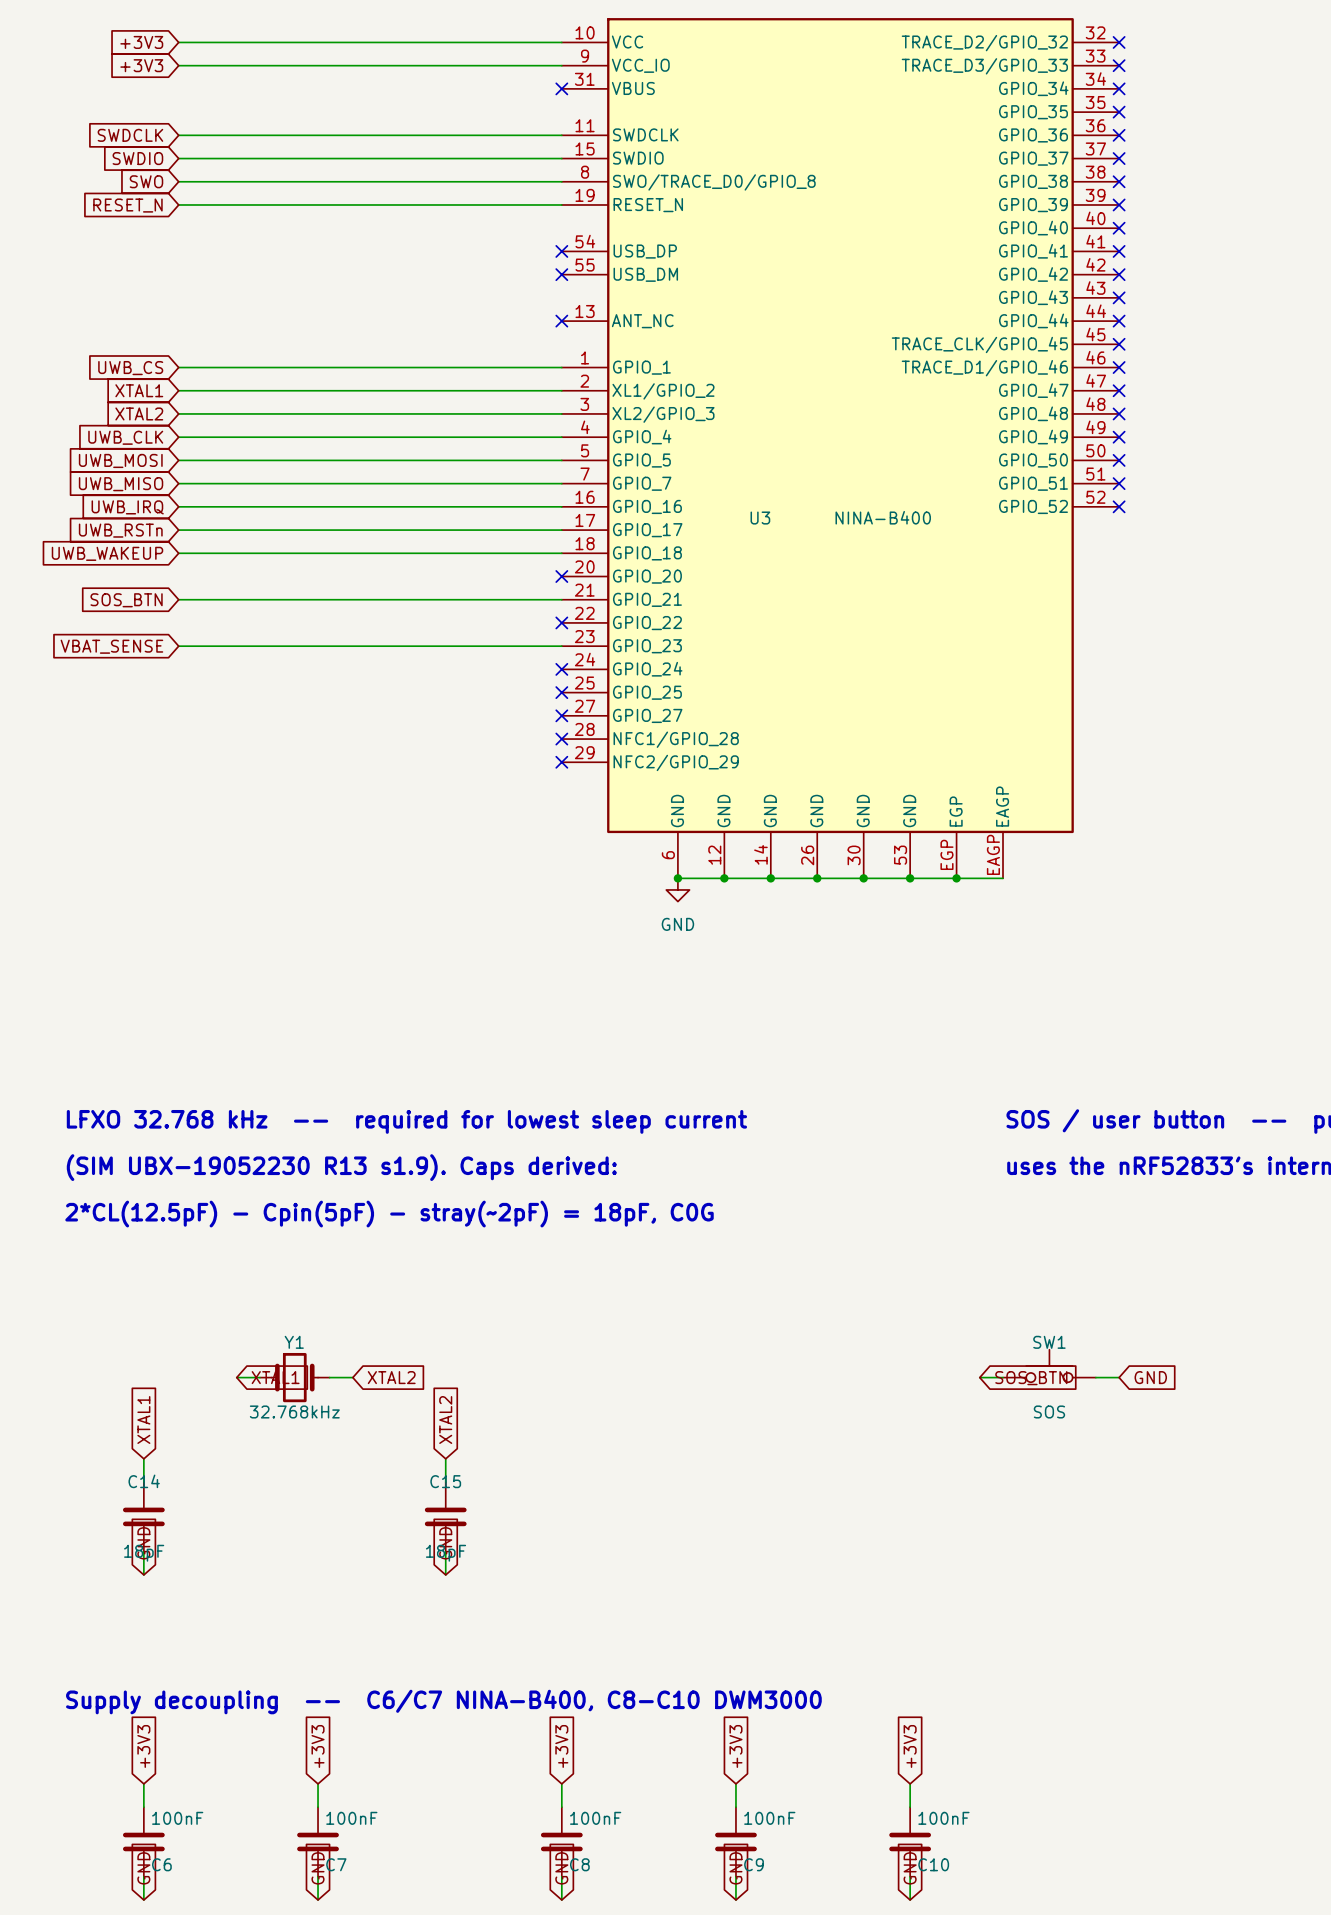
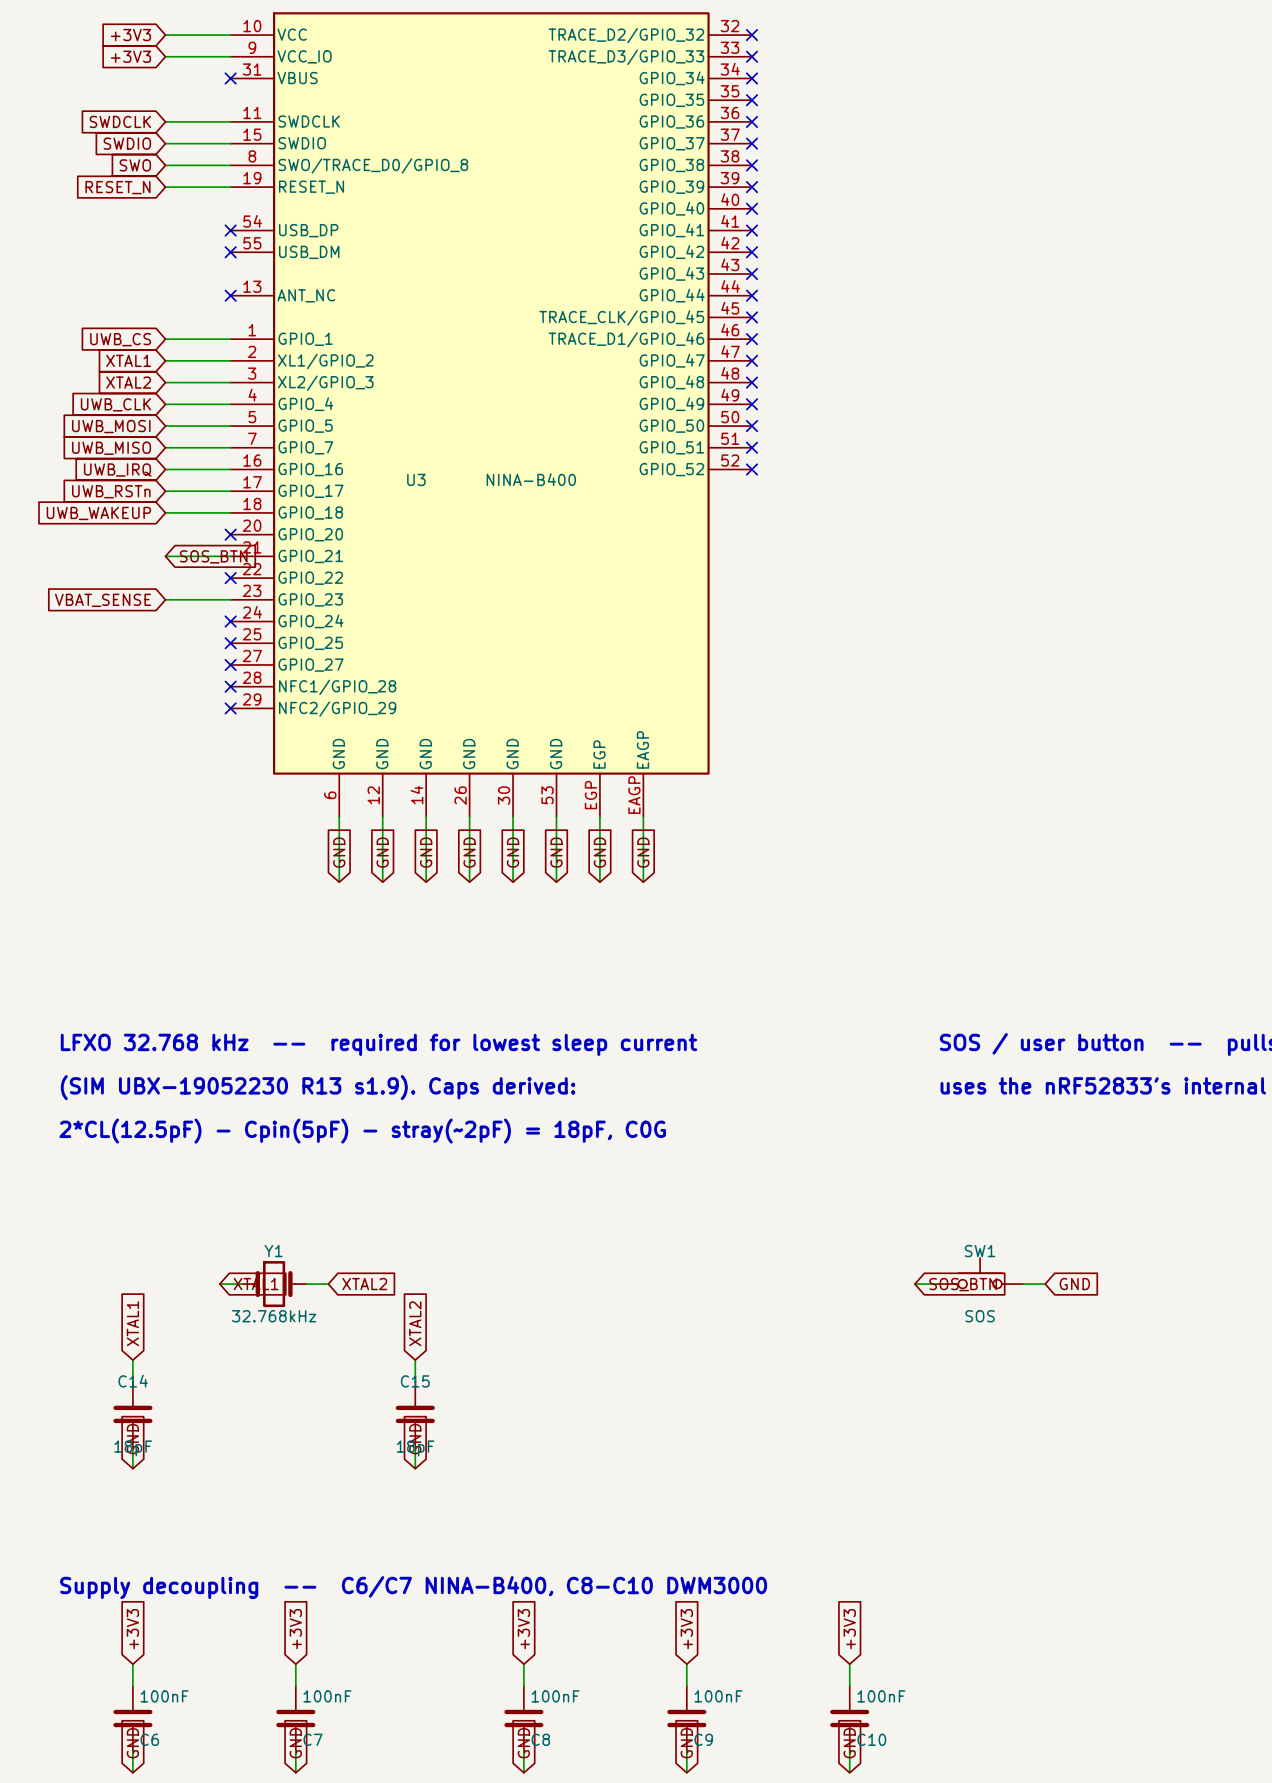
no-connect mark: none -> (751, 35)
no-connect mark: (1119, 42) -> none
no-connect mark: none -> (751, 56)
no-connect mark: (1119, 65) -> none
no-connect mark: none -> (230, 78)
no-connect mark: (561, 88) -> none
no-connect mark: none -> (751, 78)
no-connect mark: (1119, 88) -> none
no-connect mark: none -> (751, 100)
no-connect mark: (1119, 112) -> none
no-connect mark: none -> (751, 121)
no-connect mark: (1119, 135) -> none
no-connect mark: none -> (751, 143)
no-connect mark: (1119, 158) -> none
no-connect mark: none -> (751, 165)
no-connect mark: (1119, 181) -> none
no-connect mark: none -> (751, 187)
no-connect mark: (1119, 204) -> none
no-connect mark: none -> (751, 208)
no-connect mark: (1119, 228) -> none
no-connect mark: none -> (230, 230)
no-connect mark: (561, 251) -> none
no-connect mark: none -> (751, 230)
no-connect mark: (1119, 251) -> none
no-connect mark: none -> (230, 252)
no-connect mark: (561, 274) -> none
no-connect mark: none -> (751, 252)
no-connect mark: (1119, 274) -> none
no-connect mark: none -> (751, 273)
no-connect mark: (1119, 297) -> none
no-connect mark: none -> (230, 295)
no-connect mark: (561, 321) -> none
no-connect mark: none -> (751, 295)
no-connect mark: (1119, 321) -> none
no-connect mark: none -> (751, 317)
no-connect mark: (1119, 344) -> none
no-connect mark: none -> (751, 339)
no-connect mark: (1119, 367) -> none
no-connect mark: none -> (751, 360)
no-connect mark: (1119, 390) -> none
no-connect mark: none -> (751, 382)
no-connect mark: (1119, 413) -> none
no-connect mark: none -> (751, 404)
no-connect mark: (1119, 437) -> none
U3 position: (840, 448) -> (491, 414)
no-connect mark: none -> (751, 426)
no-connect mark: (1119, 460) -> none
no-connect mark: none -> (751, 447)
no-connect mark: (1119, 483) -> none
no-connect mark: none -> (751, 469)
no-connect mark: (1119, 506) -> none
no-connect mark: none -> (230, 534)
no-connect mark: (561, 576) -> none
global label rotation: 0° (126, 600) -> 180° (213, 556)
no-connect mark: none -> (230, 578)
no-connect mark: (561, 622) -> none
no-connect mark: none -> (230, 621)
no-connect mark: (561, 669) -> none
no-connect mark: none -> (230, 643)
no-connect mark: (561, 692) -> none
no-connect mark: none -> (230, 664)
no-connect mark: (561, 715) -> none
no-connect mark: none -> (230, 686)
no-connect mark: (561, 739) -> none
no-connect mark: none -> (230, 708)
no-connect mark: (561, 762) -> none
wire: none -> (339, 817) (339, 882)
wire: none -> (382, 817) (382, 882)
wire: none -> (426, 817) (426, 882)
wire: none -> (469, 817) (469, 882)
wire: none -> (513, 817) (513, 882)
wire: none -> (556, 817) (556, 882)
wire: none -> (599, 817) (599, 882)
wire: (677, 878) (1003, 878) -> none
junction: (677, 878) -> none
wire: none -> (643, 817) (643, 882)
junction: (724, 878) -> none
junction: (770, 878) -> none
junction: (817, 878) -> none
junction: (863, 878) -> none
junction: (910, 878) -> none
junction: (956, 878) -> none
power symbol: GND (677, 889) -> none
global label: none -> GND (339, 852)
global label: none -> GND (382, 852)
global label: none -> GND (426, 852)
global label: none -> GND (469, 852)
global label: none -> GND (513, 852)
global label: none -> GND (556, 852)
global label: none -> GND (599, 852)
global label: none -> GND (643, 852)

